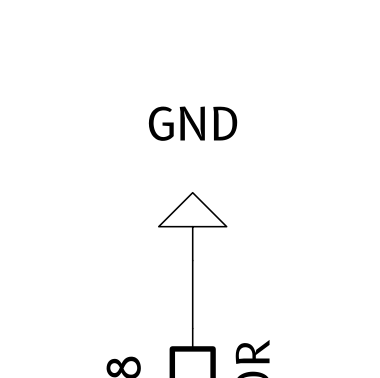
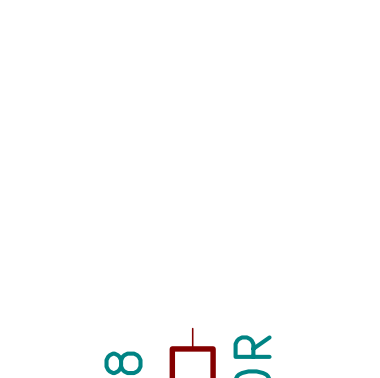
power symbol: GND (192, 226) -> none
wire: (192, 260) (192, 328) -> none

